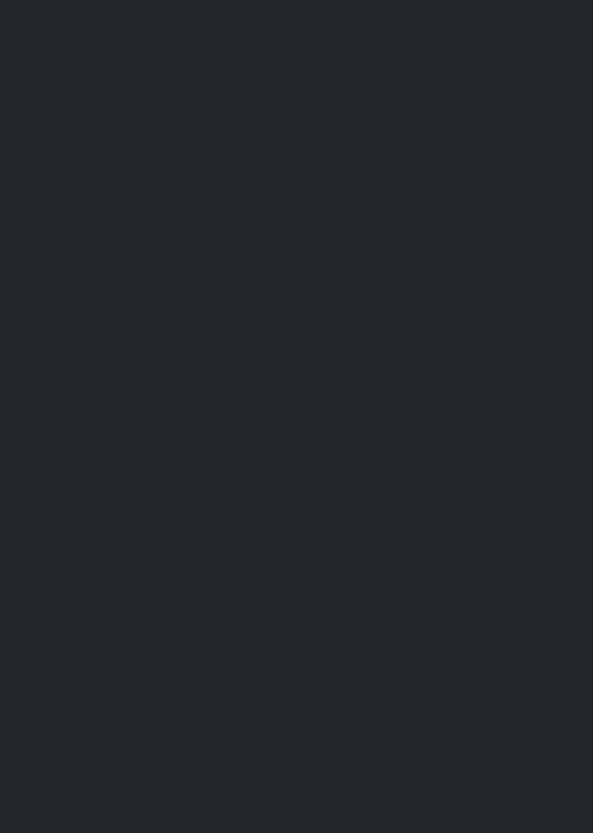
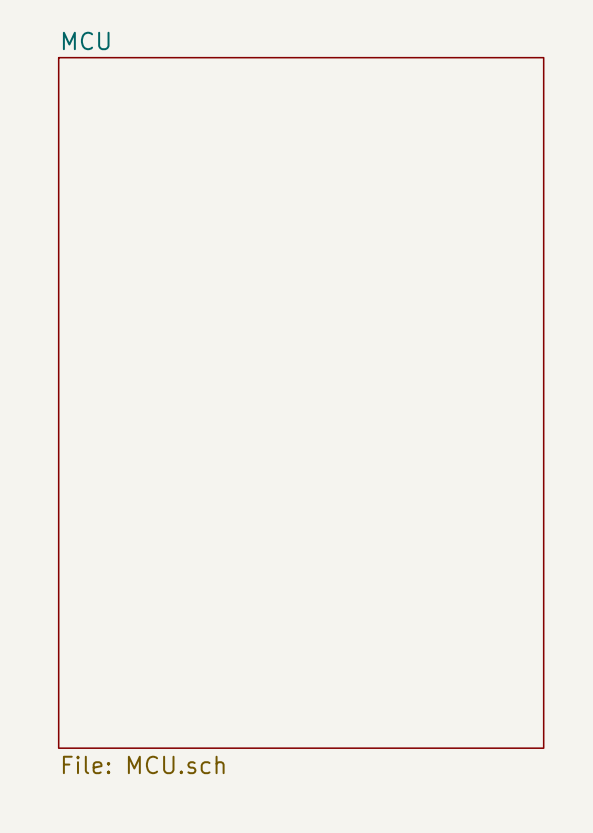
sheet MCU: none -> File: MCU.sch (301, 402)

